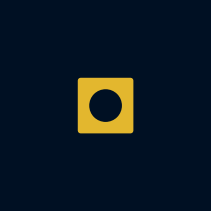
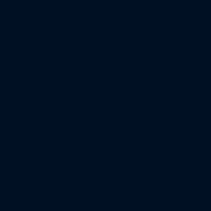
part: (105, 105) -> none

